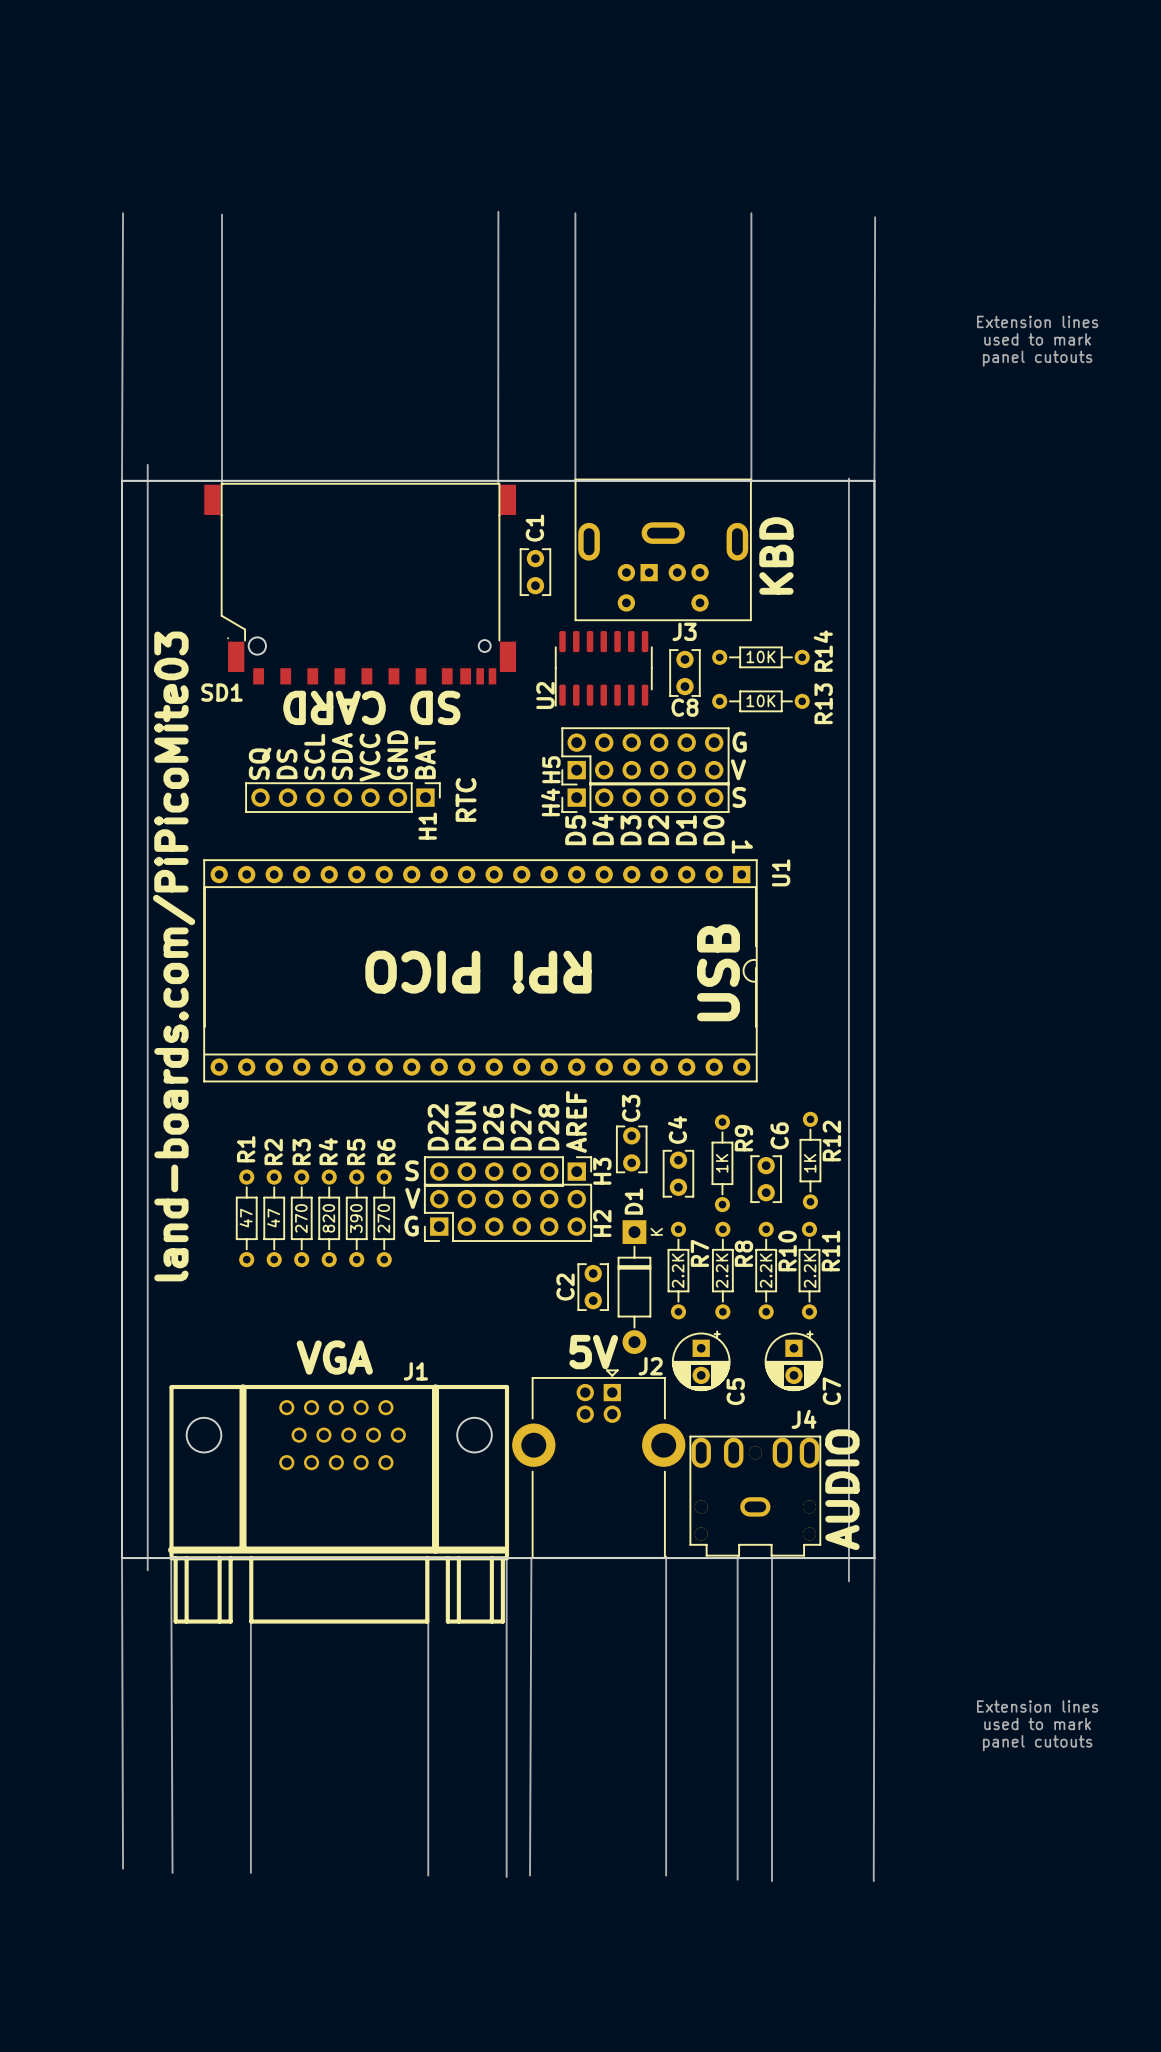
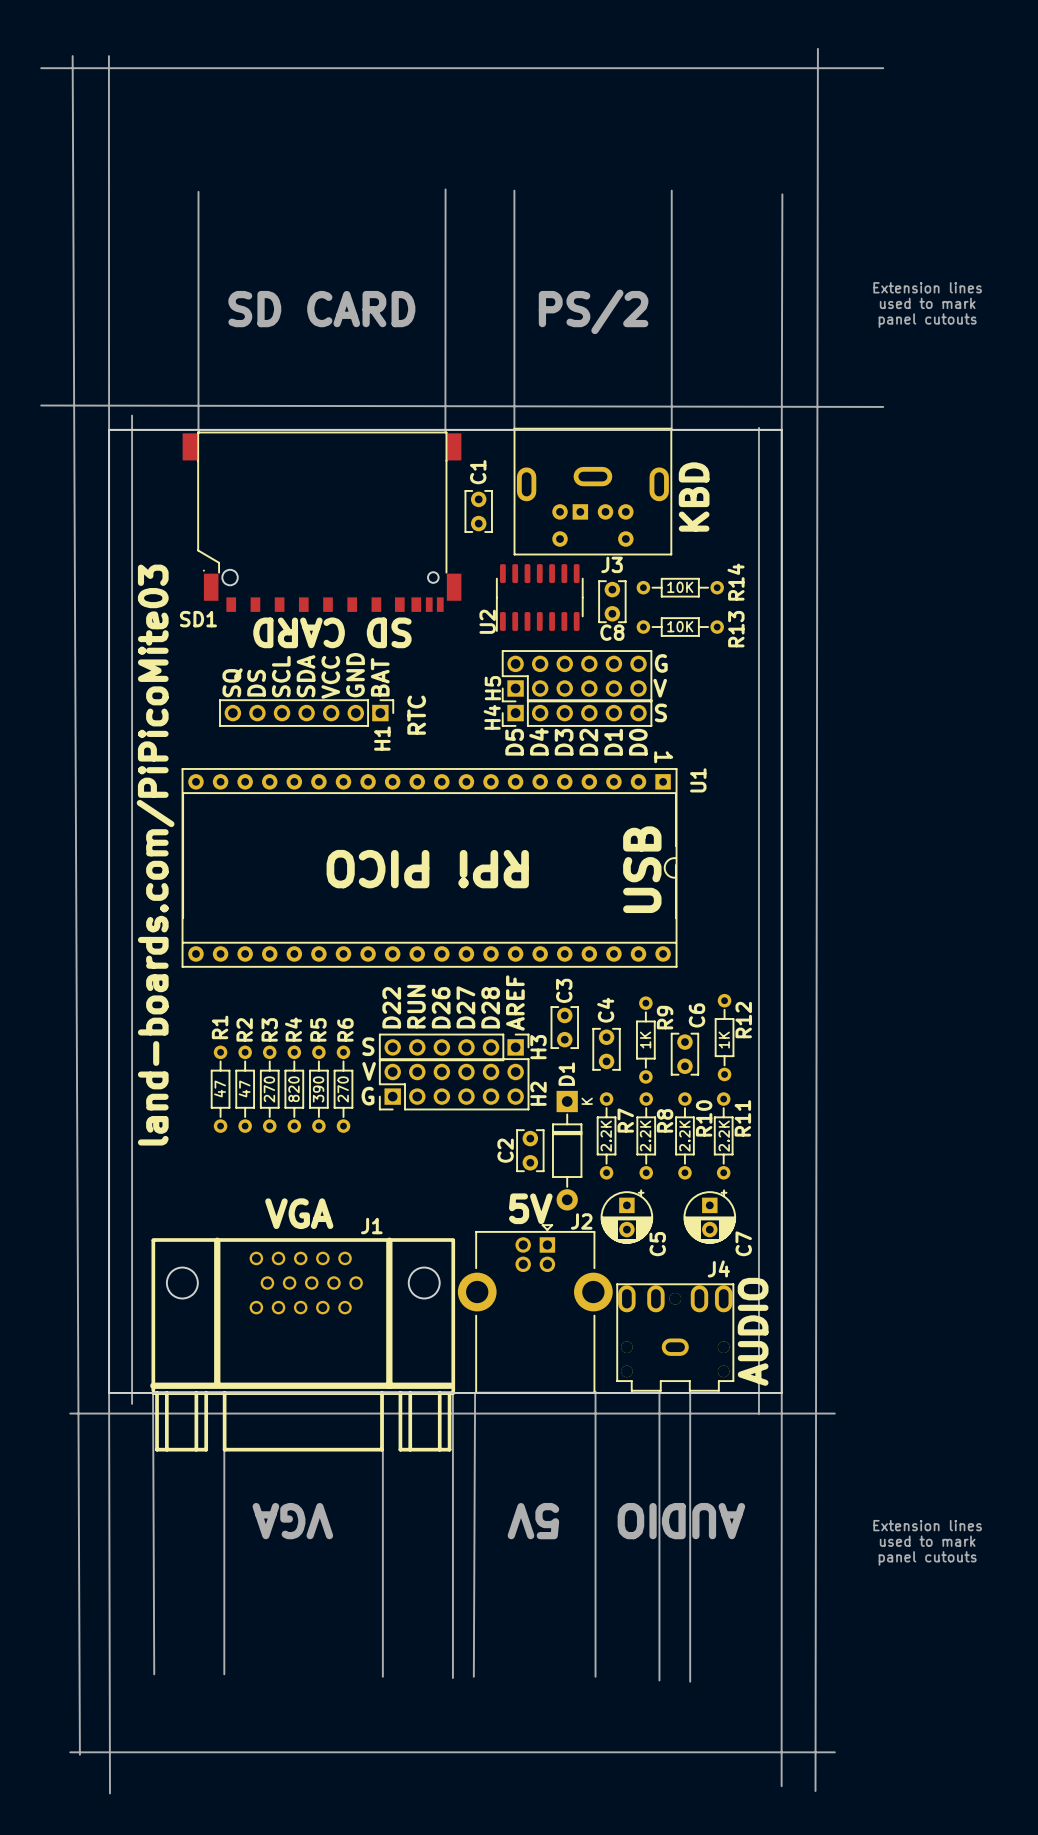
line: none -> (817, 48) (815, 1791)
line: none -> (72, 56) (79, 1754)
line: none -> (41, 68) (883, 68)
line: (123, 213) (122, 480) -> (108, 56) (109, 429)
text: none -> SD CARD (321, 309)
text: none -> PS/2 (593, 311)
line: none -> (41, 405) (883, 406)
line: (122, 1558) (123, 1868) -> (109, 1392) (109, 1793)
line: (874, 1558) (873, 1881) -> (781, 1392) (781, 1786)
line: none -> (70, 1413) (834, 1413)
text: none -> VGA (292, 1521)
text: none -> 5V (533, 1521)
text: none -> AUDIO (681, 1521)
line: none -> (70, 1752) (834, 1752)

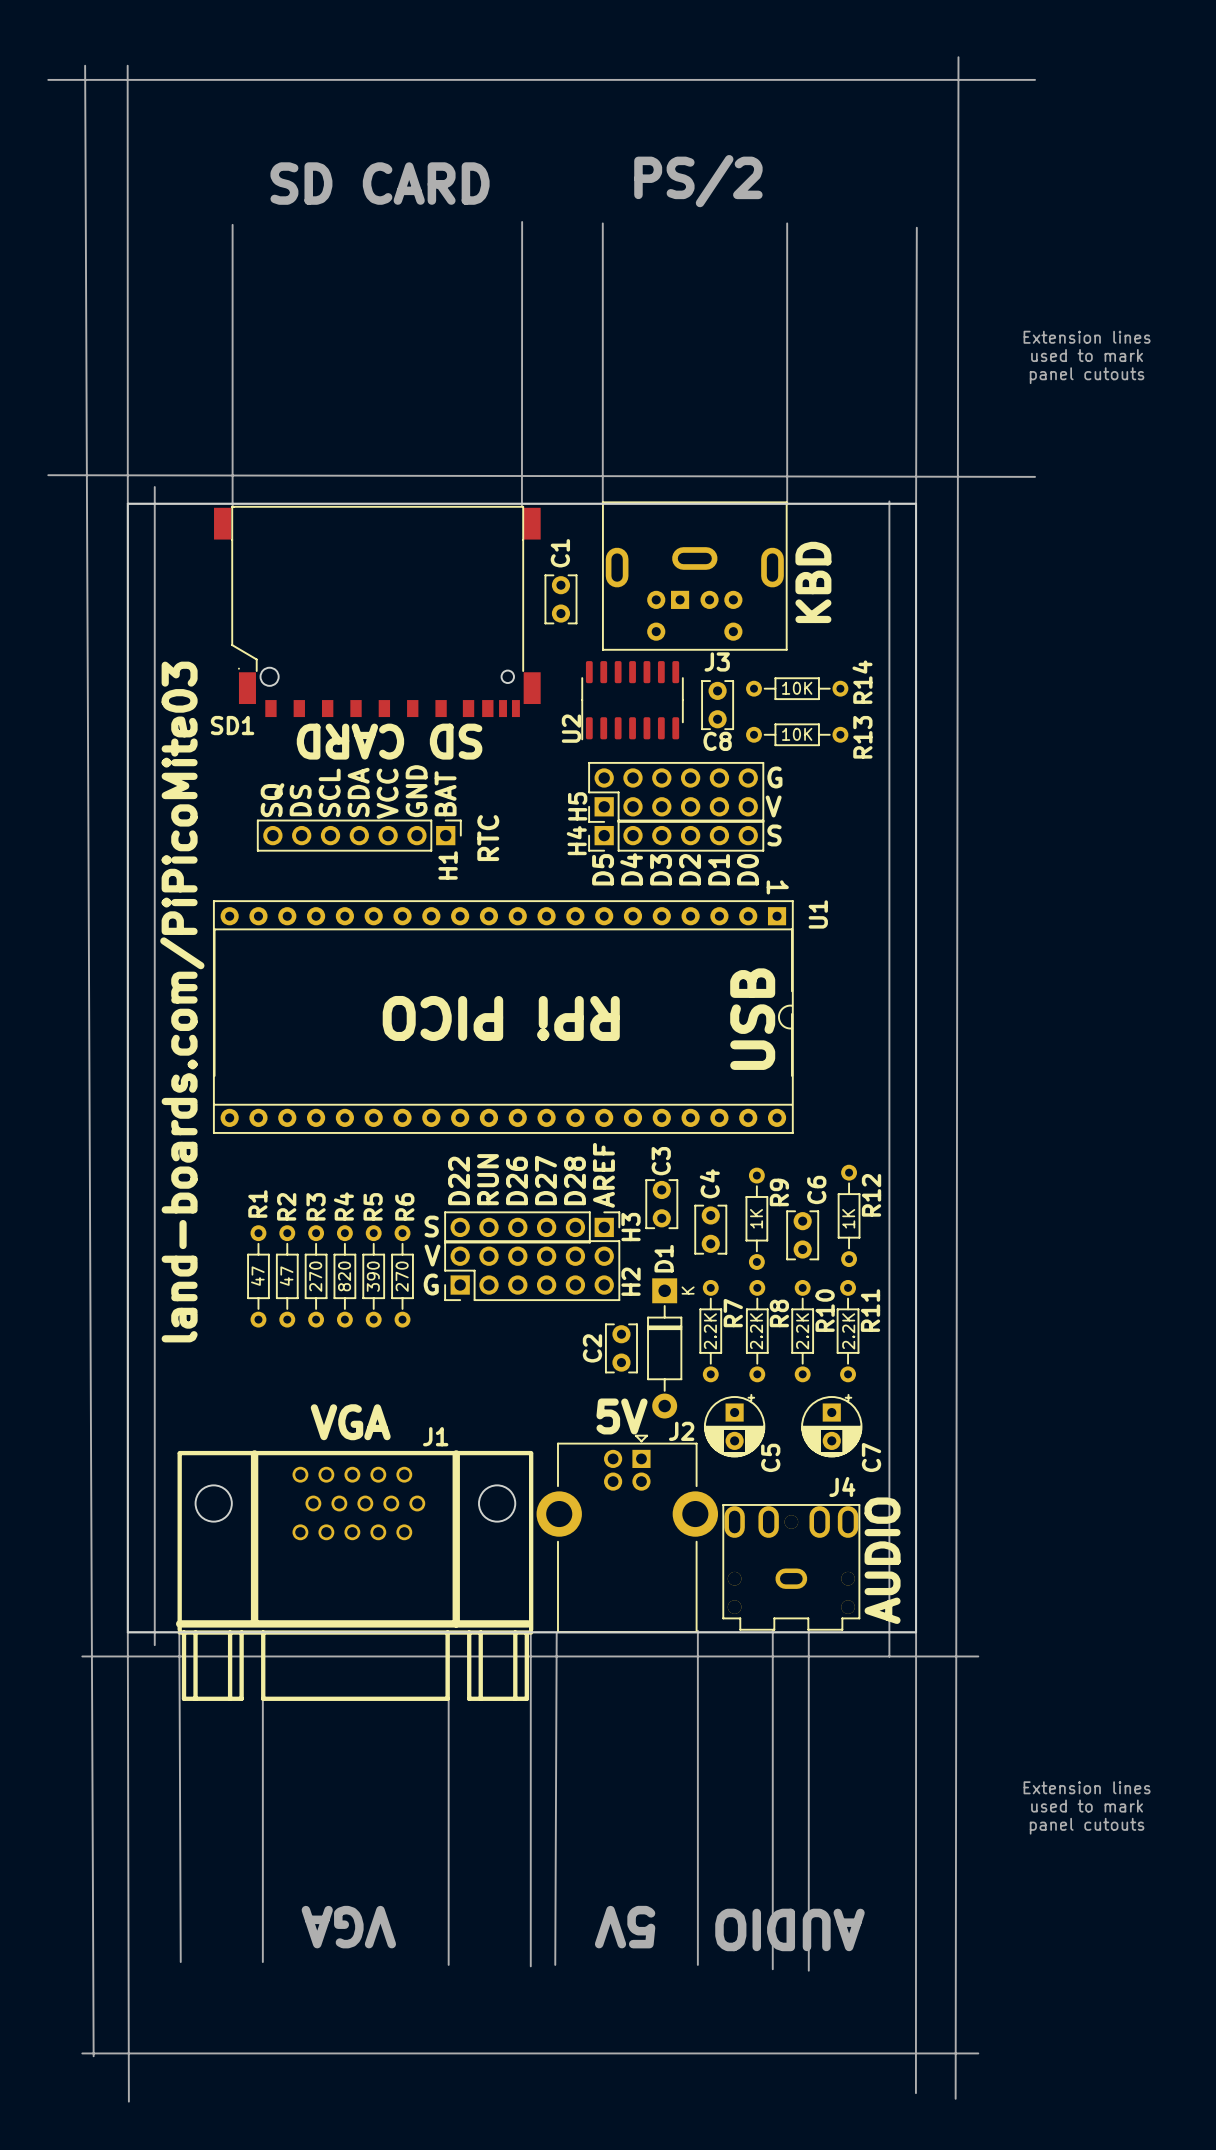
text position: SD CARD (321, 309) -> SD CARD (380, 183)
text position: PS/2 (593, 311) -> PS/2 (698, 181)
text position: VGA (292, 1521) -> VGA (348, 1927)
text position: 5V (533, 1521) -> 5V (625, 1927)
text position: AUDIO (681, 1521) -> AUDIO (789, 1929)

